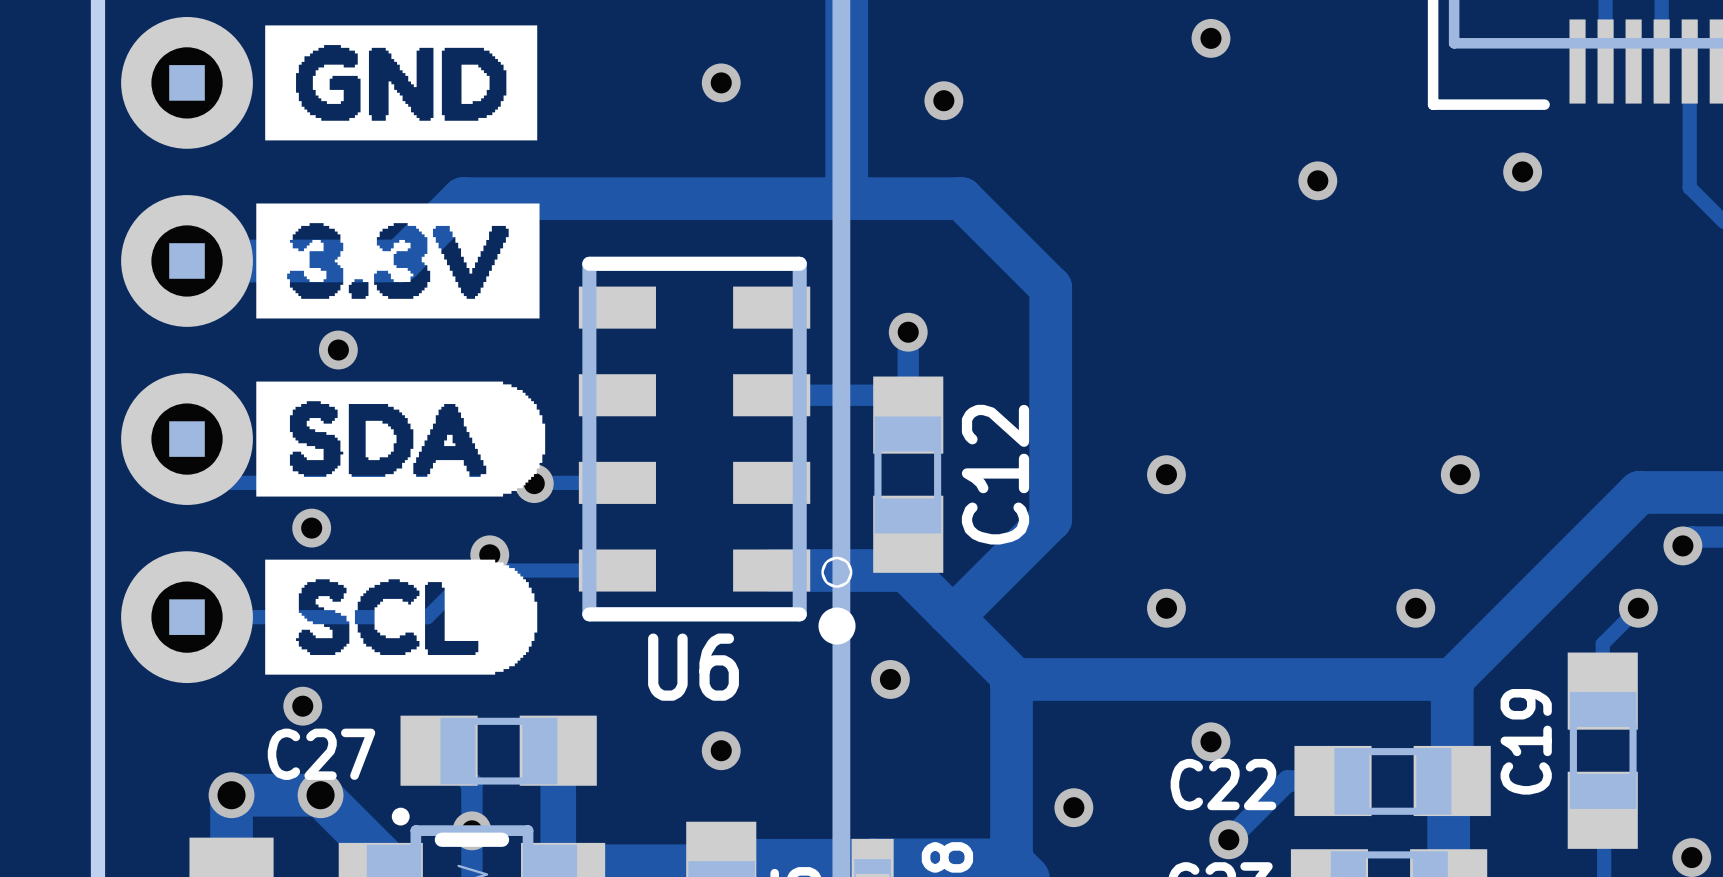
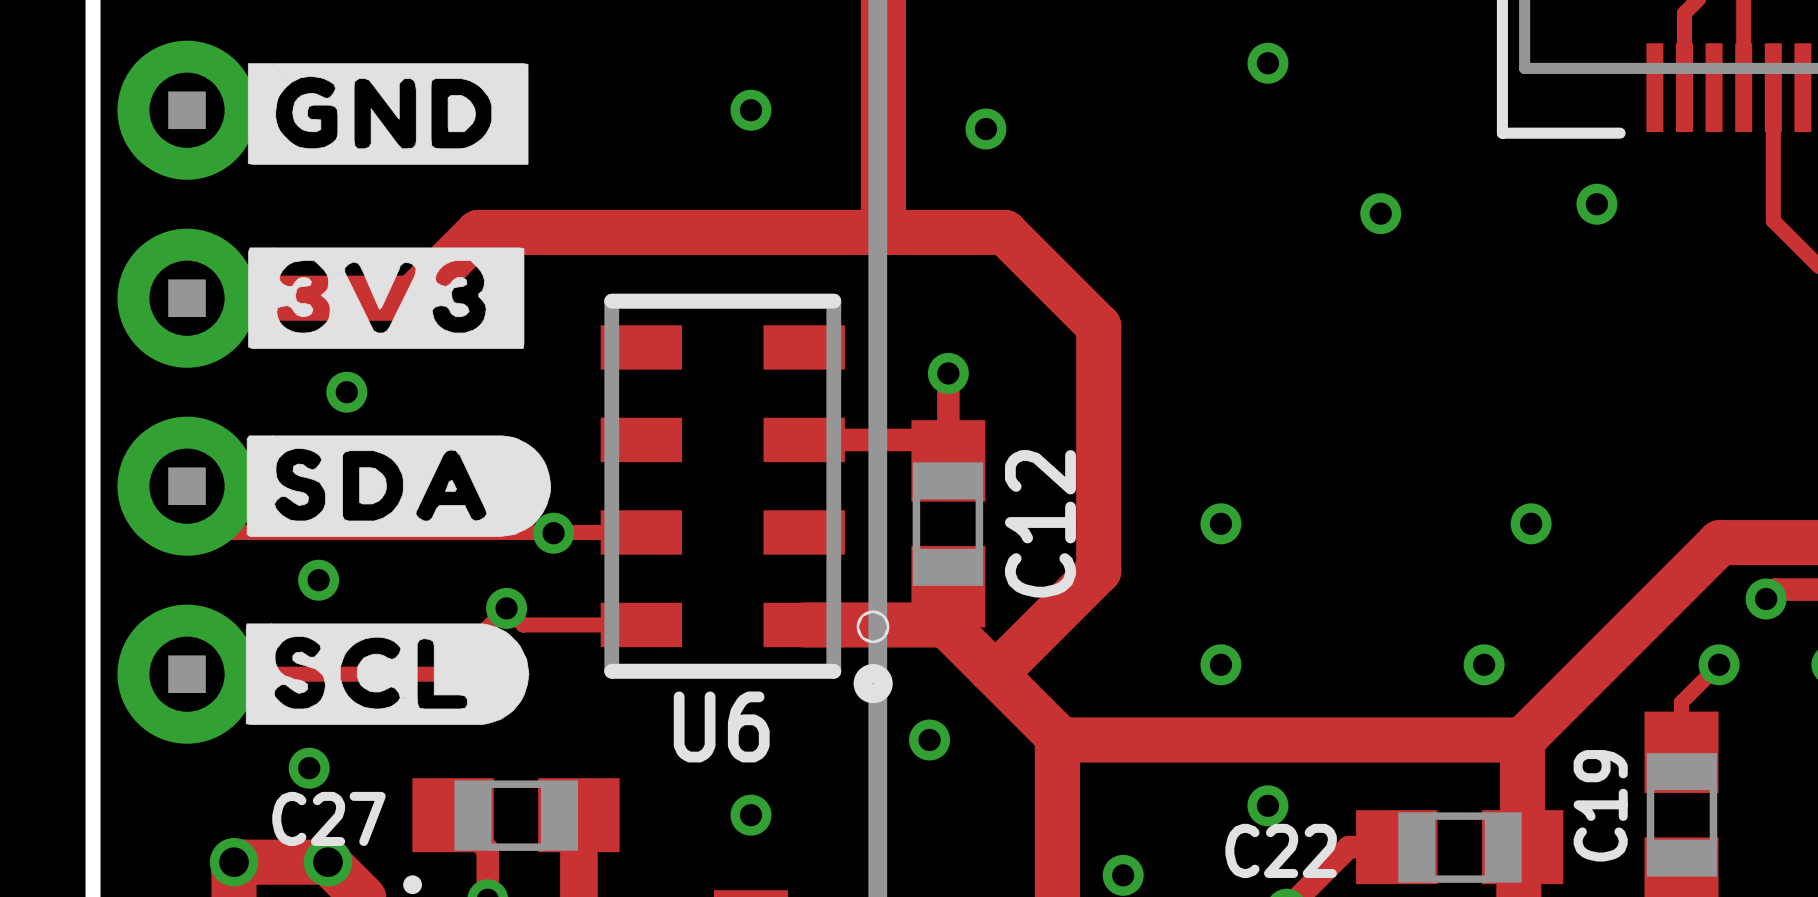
drawing shape: [265, 25, 538, 141] -> [247, 63, 529, 165]
drawing shape: [256, 203, 540, 319] -> [248, 247, 525, 349]
drawing shape: [256, 381, 546, 497] -> [246, 435, 551, 537]
drawing shape: [265, 559, 538, 675] -> [245, 623, 530, 725]

